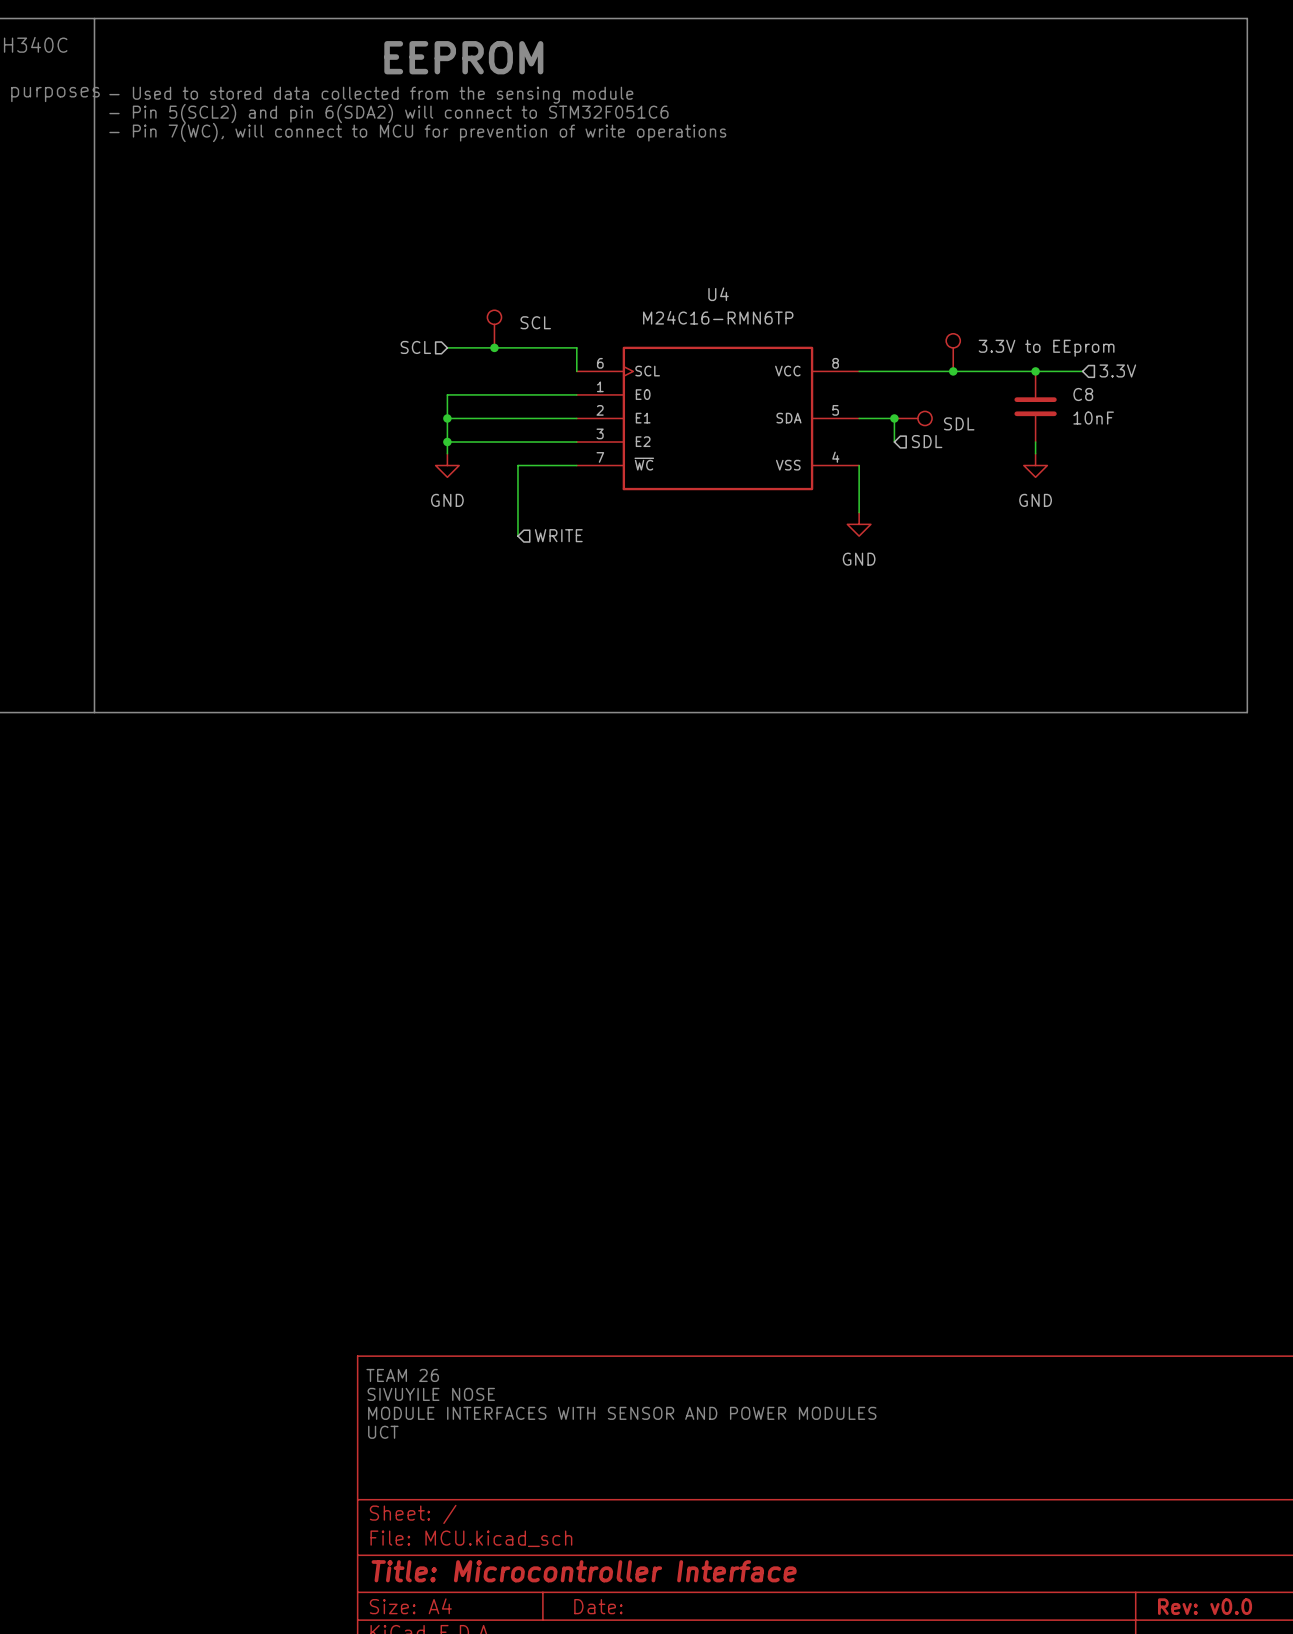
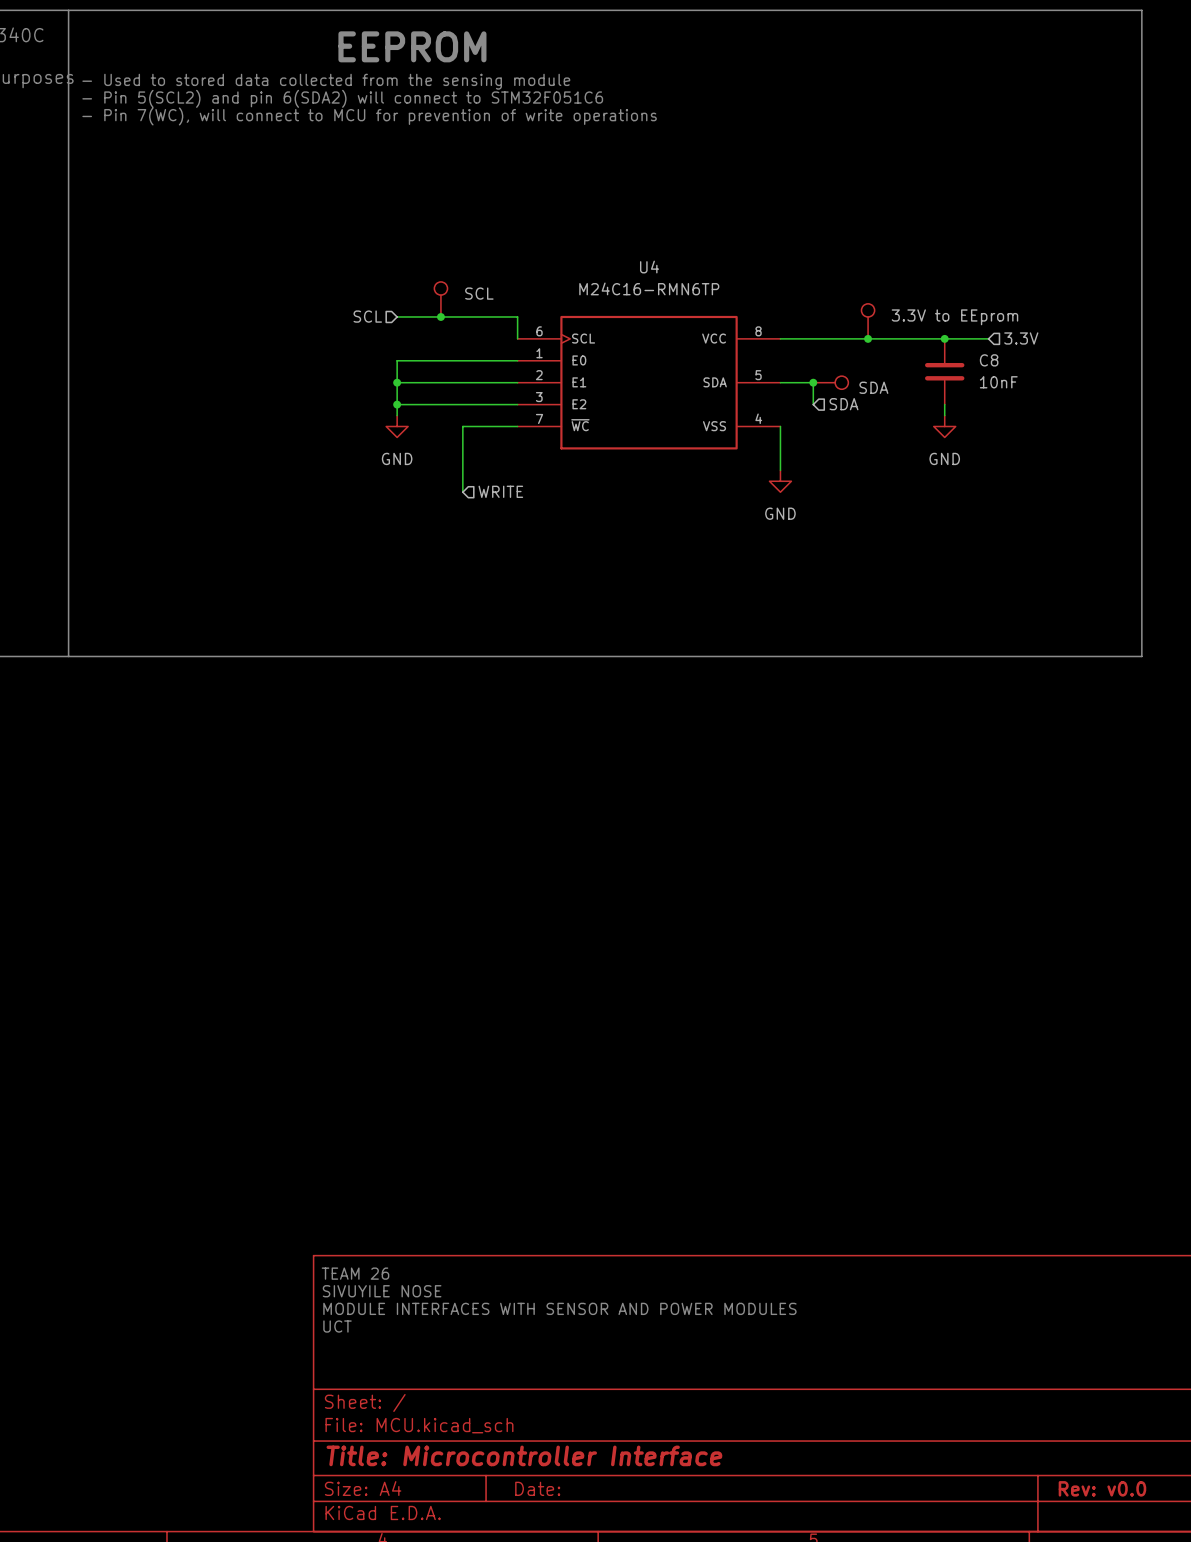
part value: SDL (959, 423) -> SDA (873, 387)
hierarchical label: SDL (927, 441) -> SDA (843, 404)

